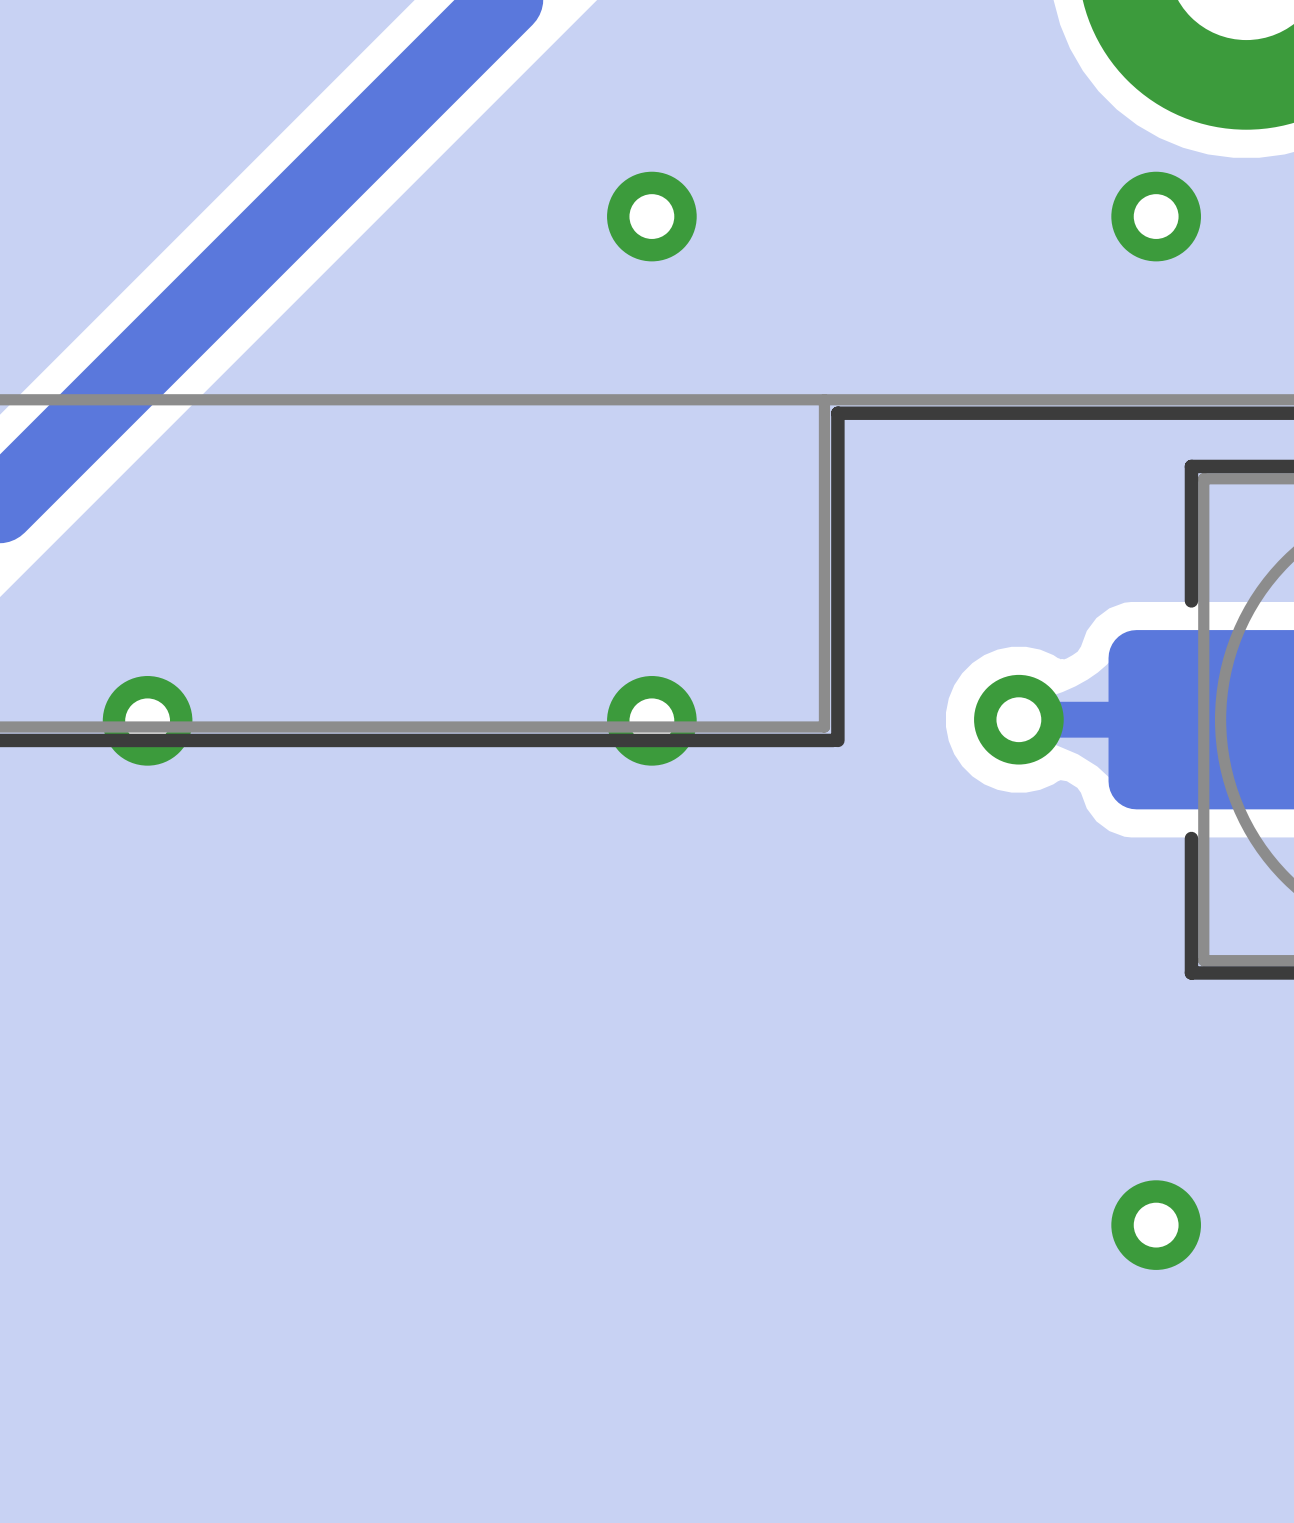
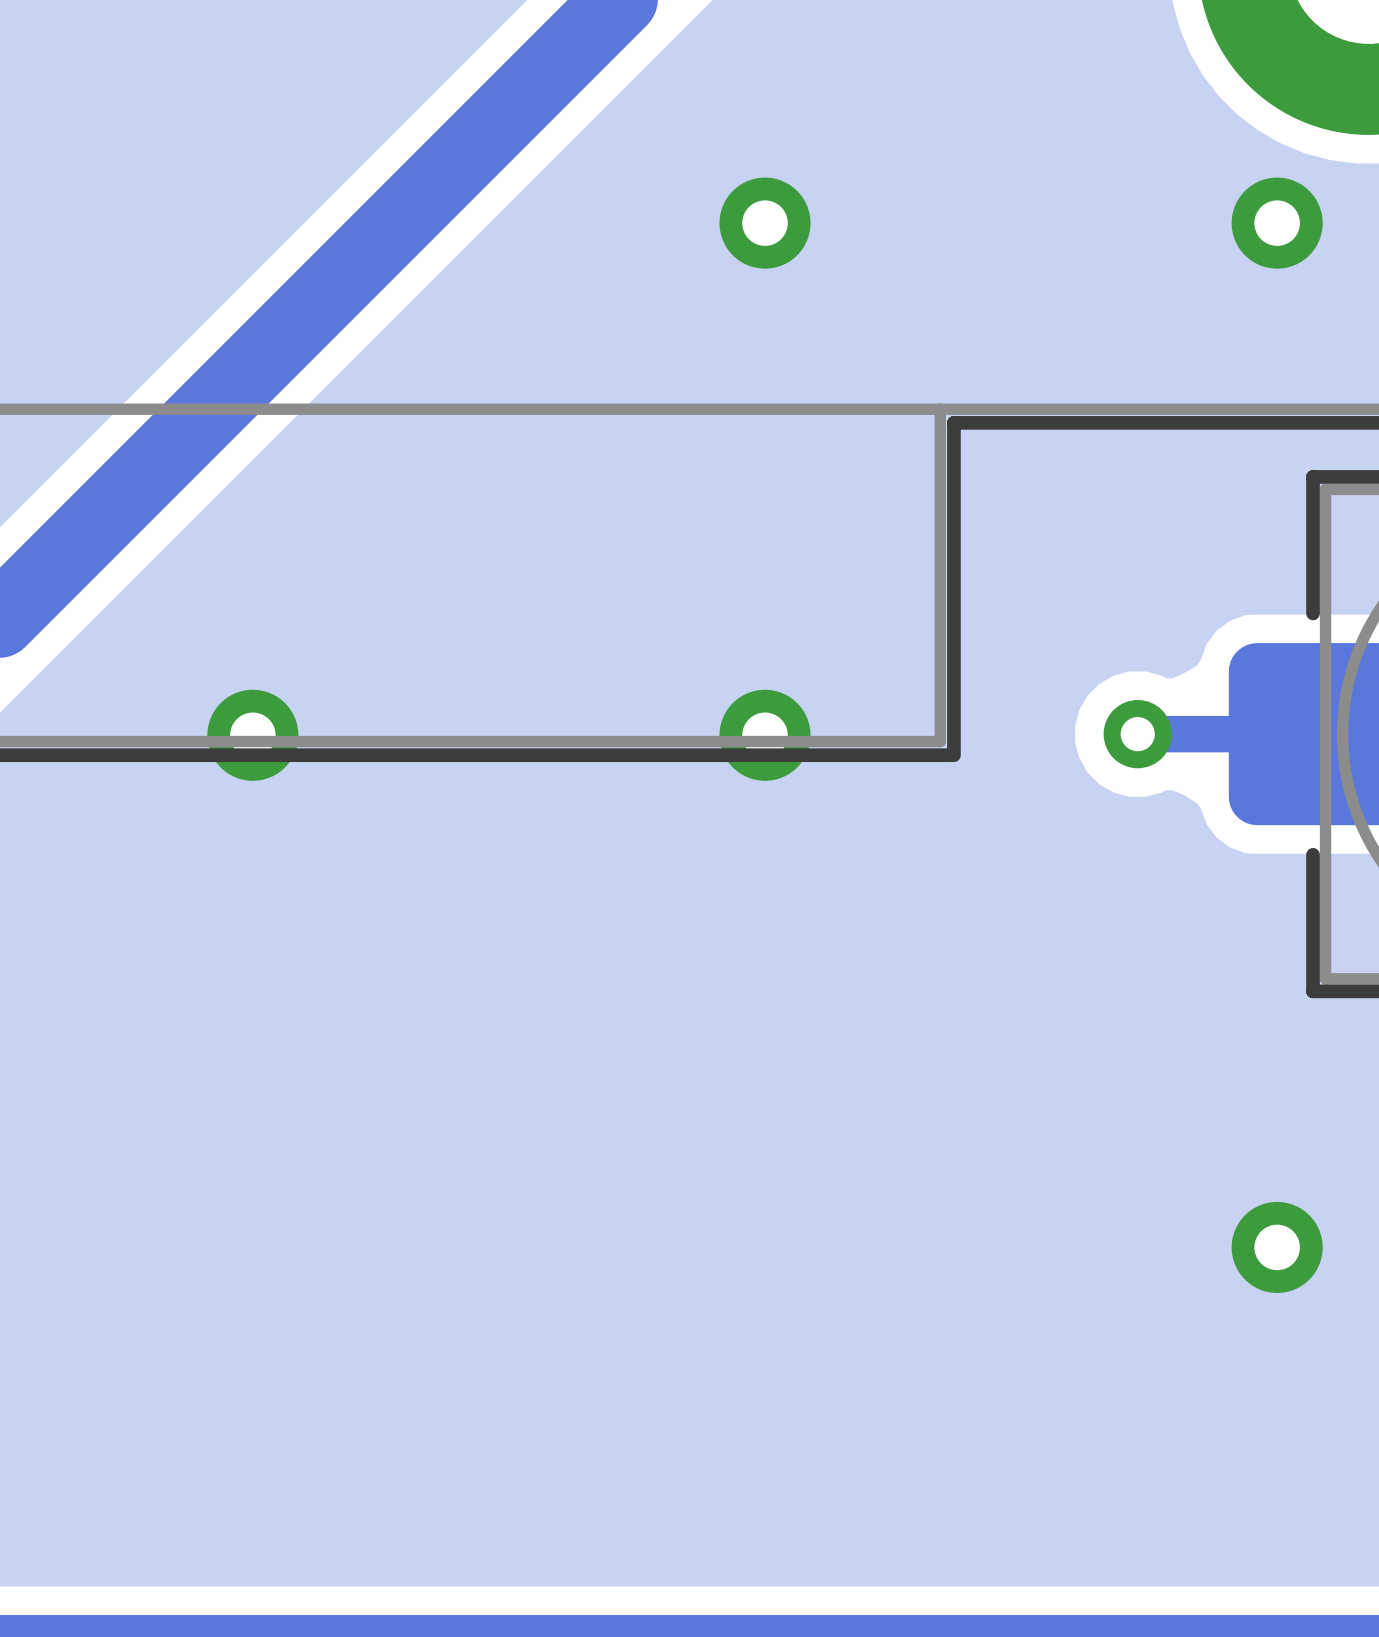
via size: [974, 674, 1064, 765] -> [1103, 700, 1172, 769]

